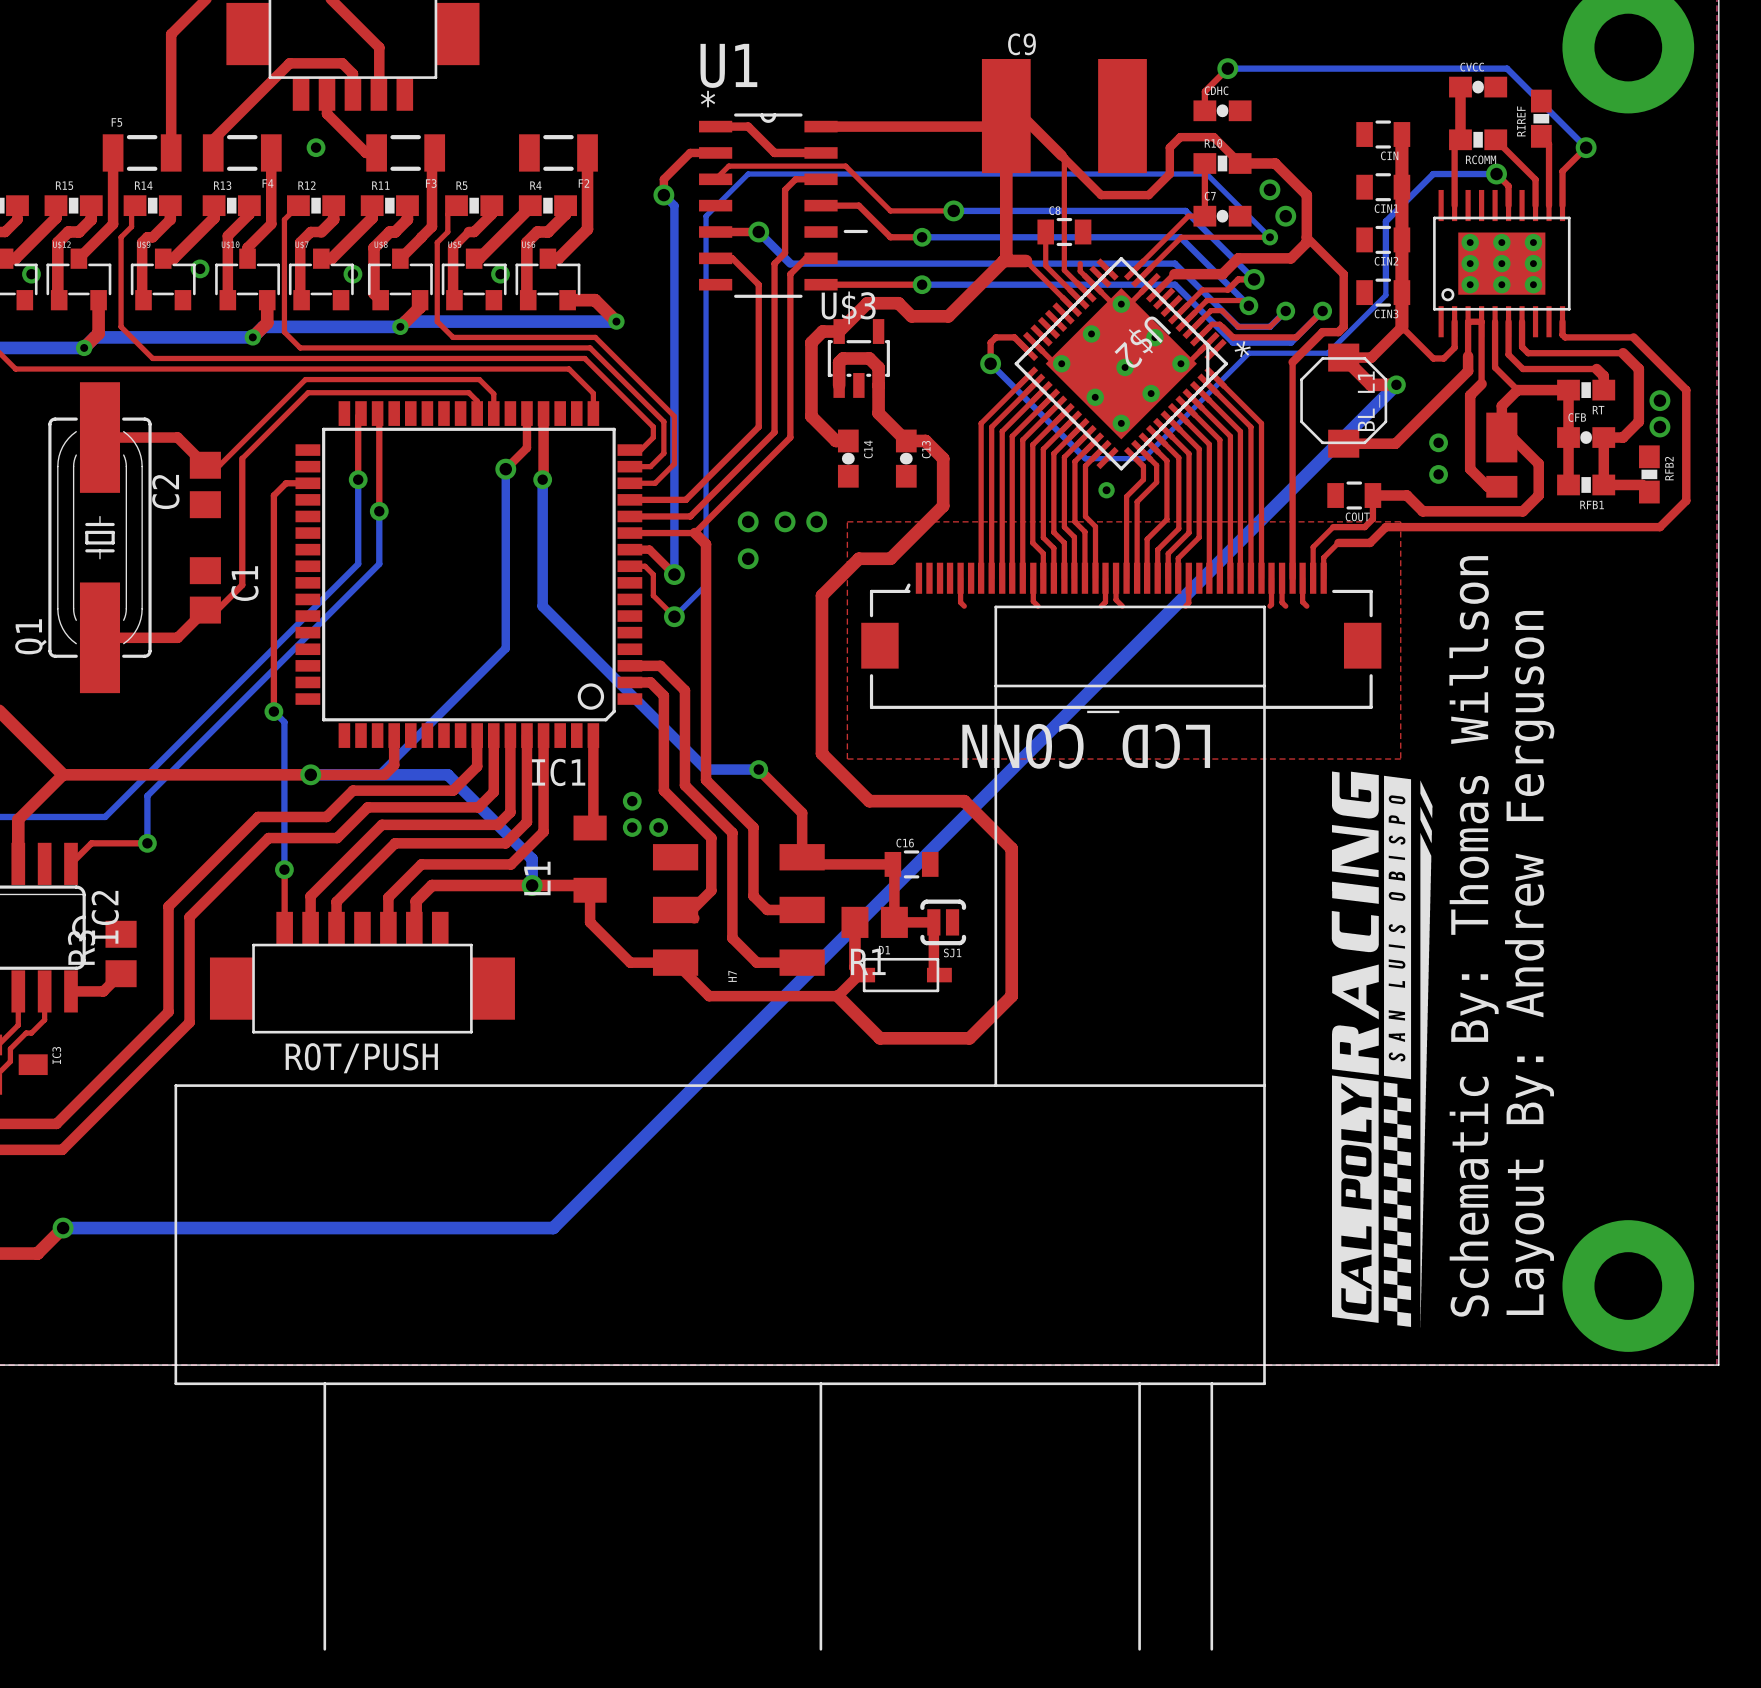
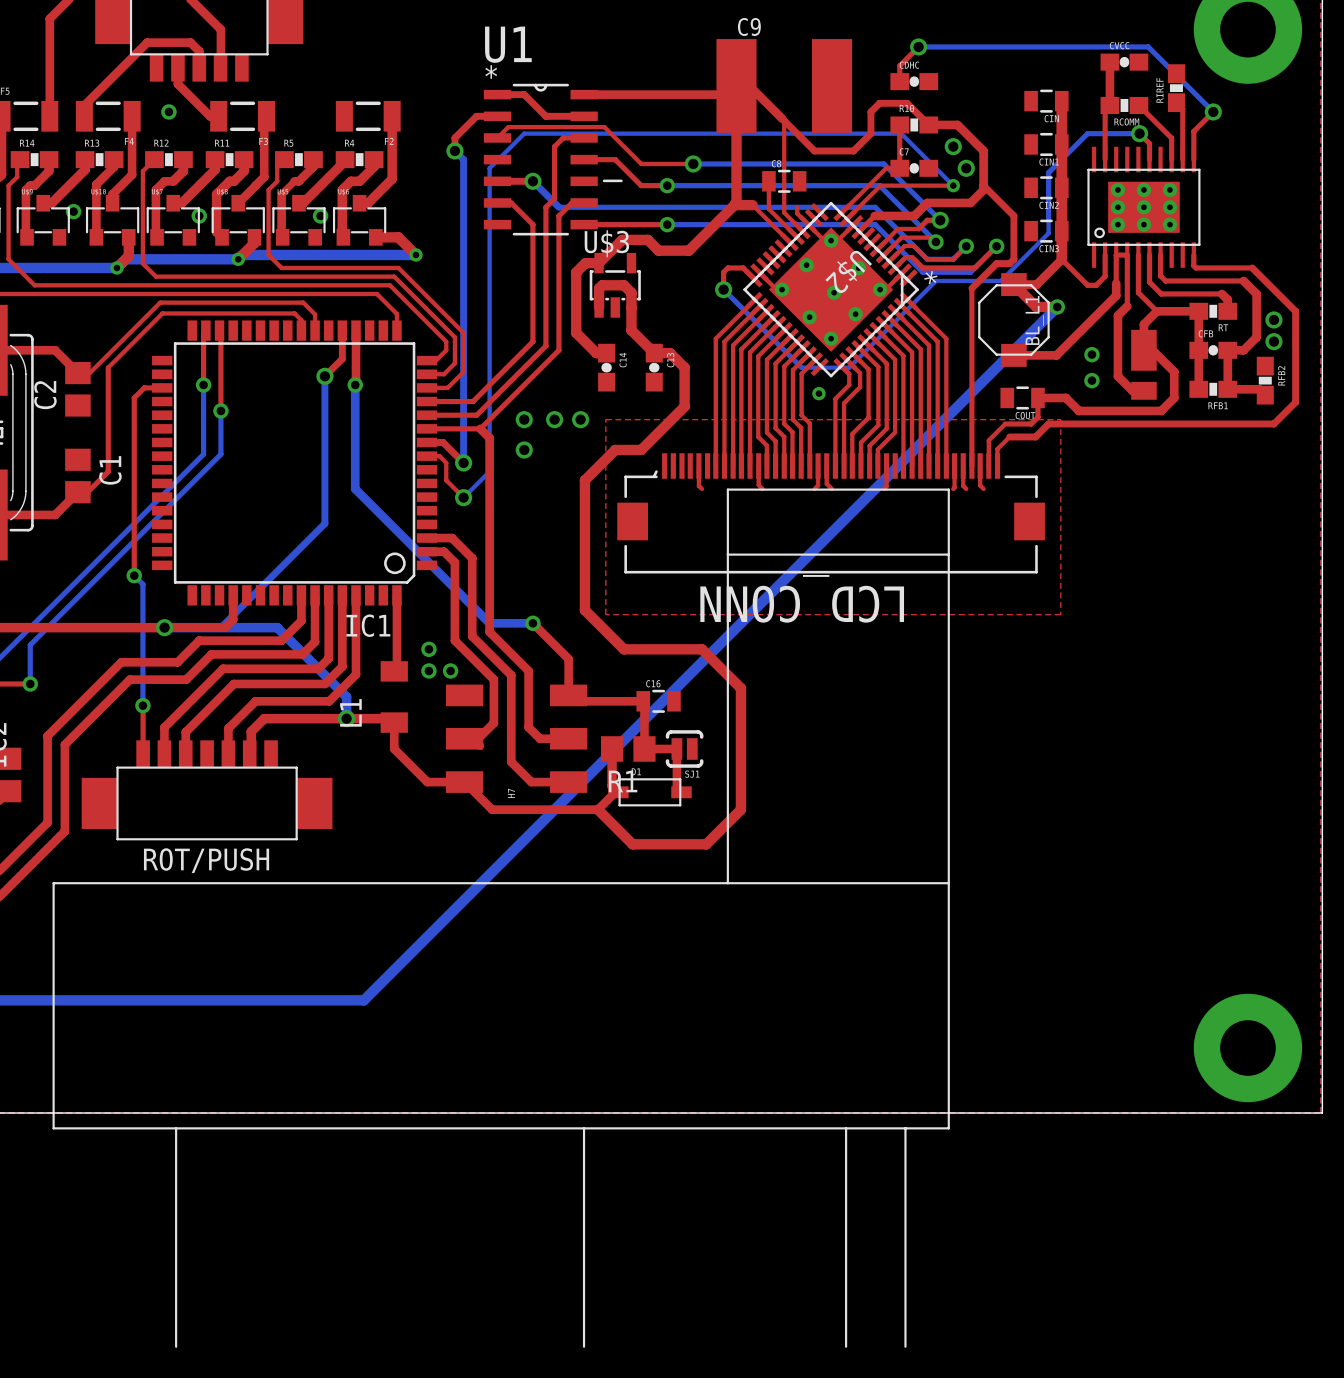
drawing: [1331, 771, 1433, 1328] -> none
text: Schematic By: Thomas Willson (1474, 936) -> none
text: Layout By: Andrew Ferguson (1529, 962) -> none

